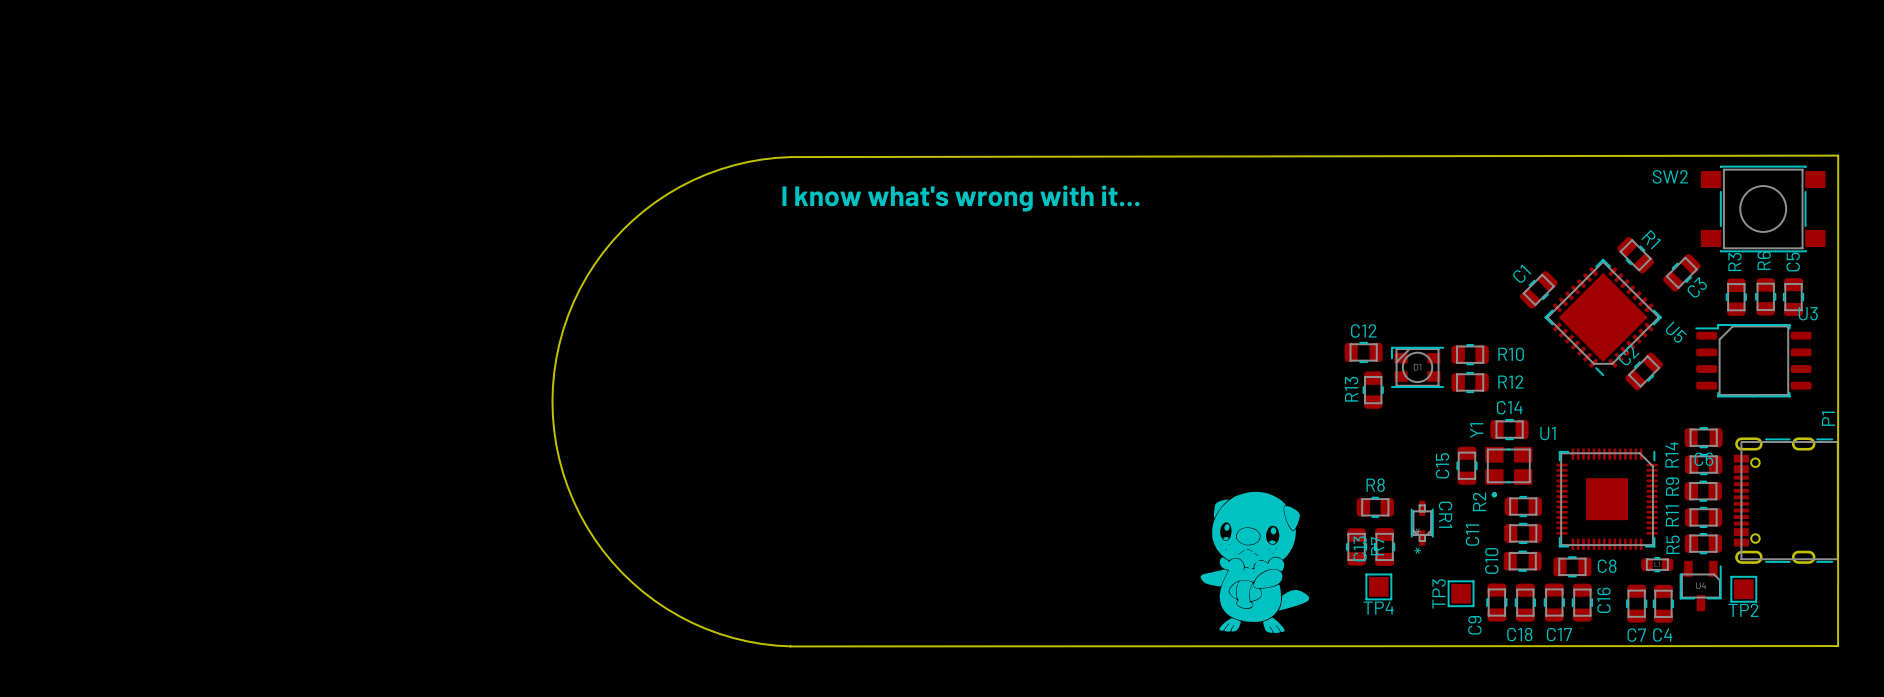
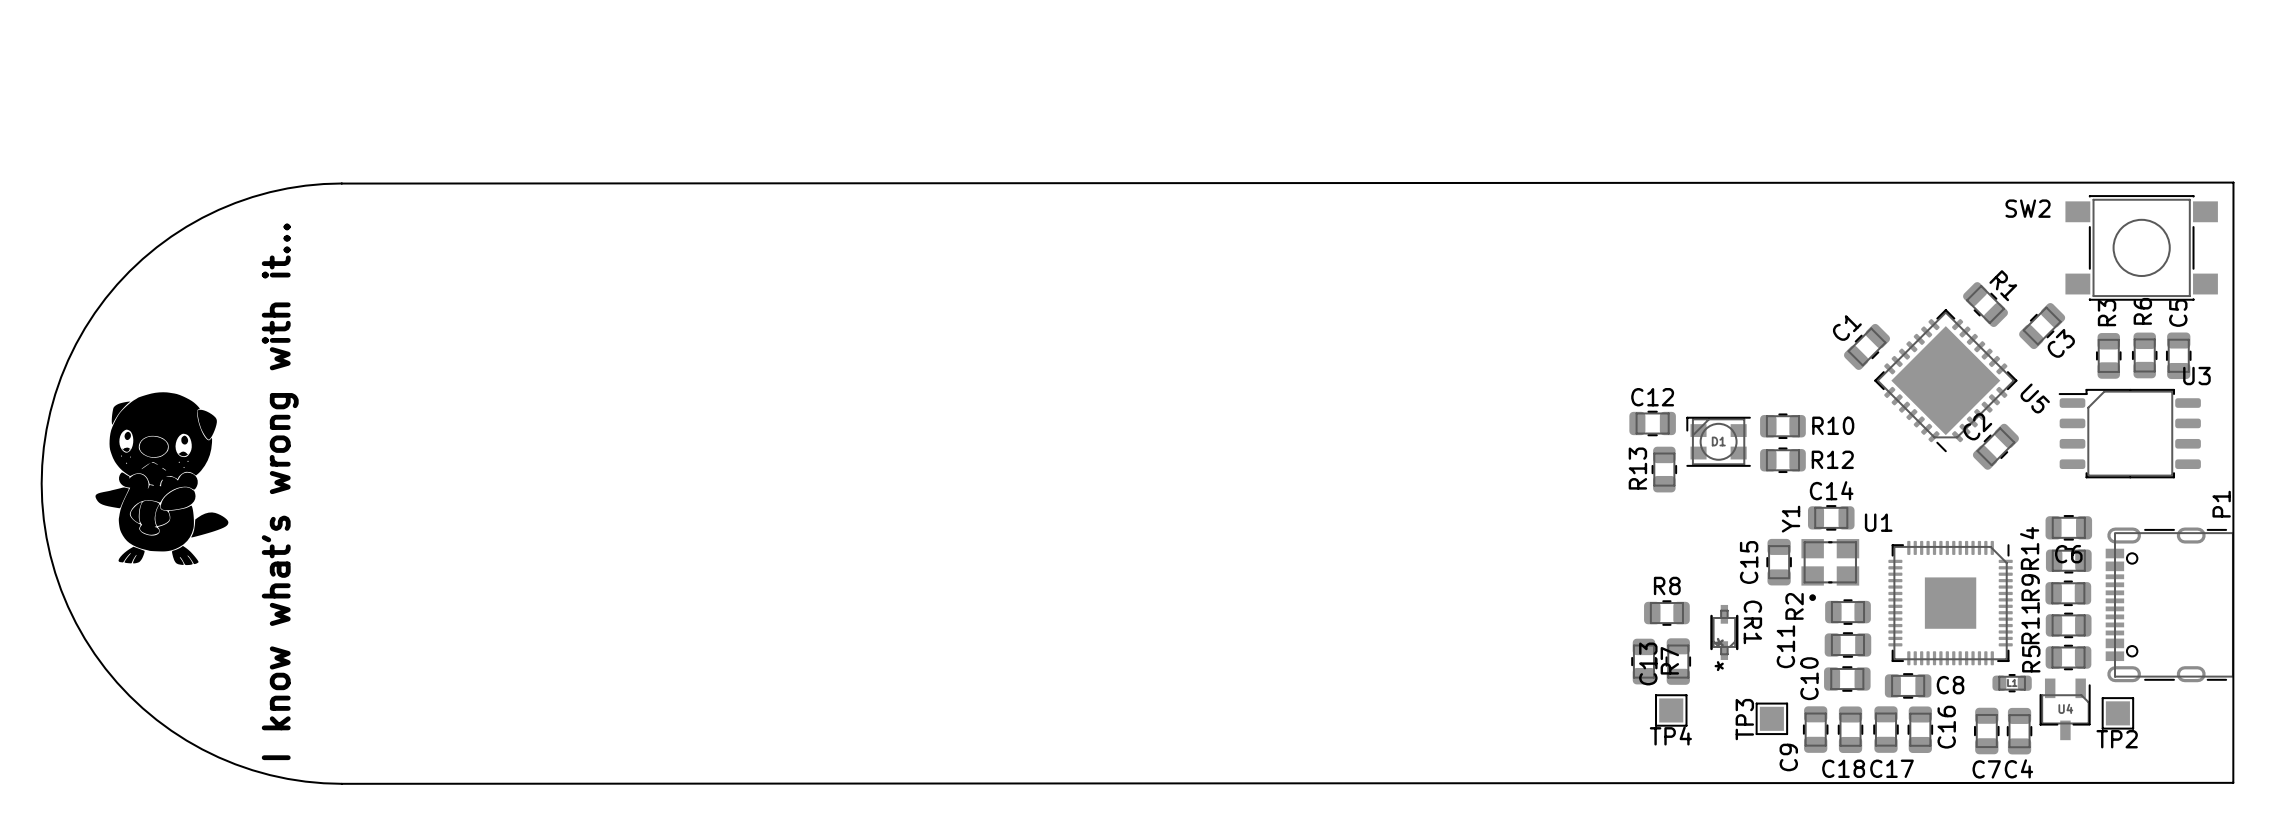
board edge: (1838, 155) (791, 157) (748, 161) (706, 174) (667, 194) (632, 220) (603, 252) (579, 289) (563, 329) (554, 372) (552, 401) (556, 444) (567, 486) (586, 526) (602, 550) (632, 582) (666, 608) (705, 628) (747, 641) (790, 646) (1838, 646) -> (2233, 182) (341, 183) (305, 185) (252, 197) (202, 217) (156, 247) (117, 284) (84, 328) (61, 377) (46, 429) (41, 483) (46, 537) (61, 590) (84, 638) (117, 682) (156, 719) (202, 749) (252, 770) (305, 781) (341, 783) (2233, 782)
text: I know what's wrong with it... (960, 198) -> none
part: none -> (161, 478)
text: none -> I know what's wrong with it... (280, 491)
part: (1254, 562) -> none

